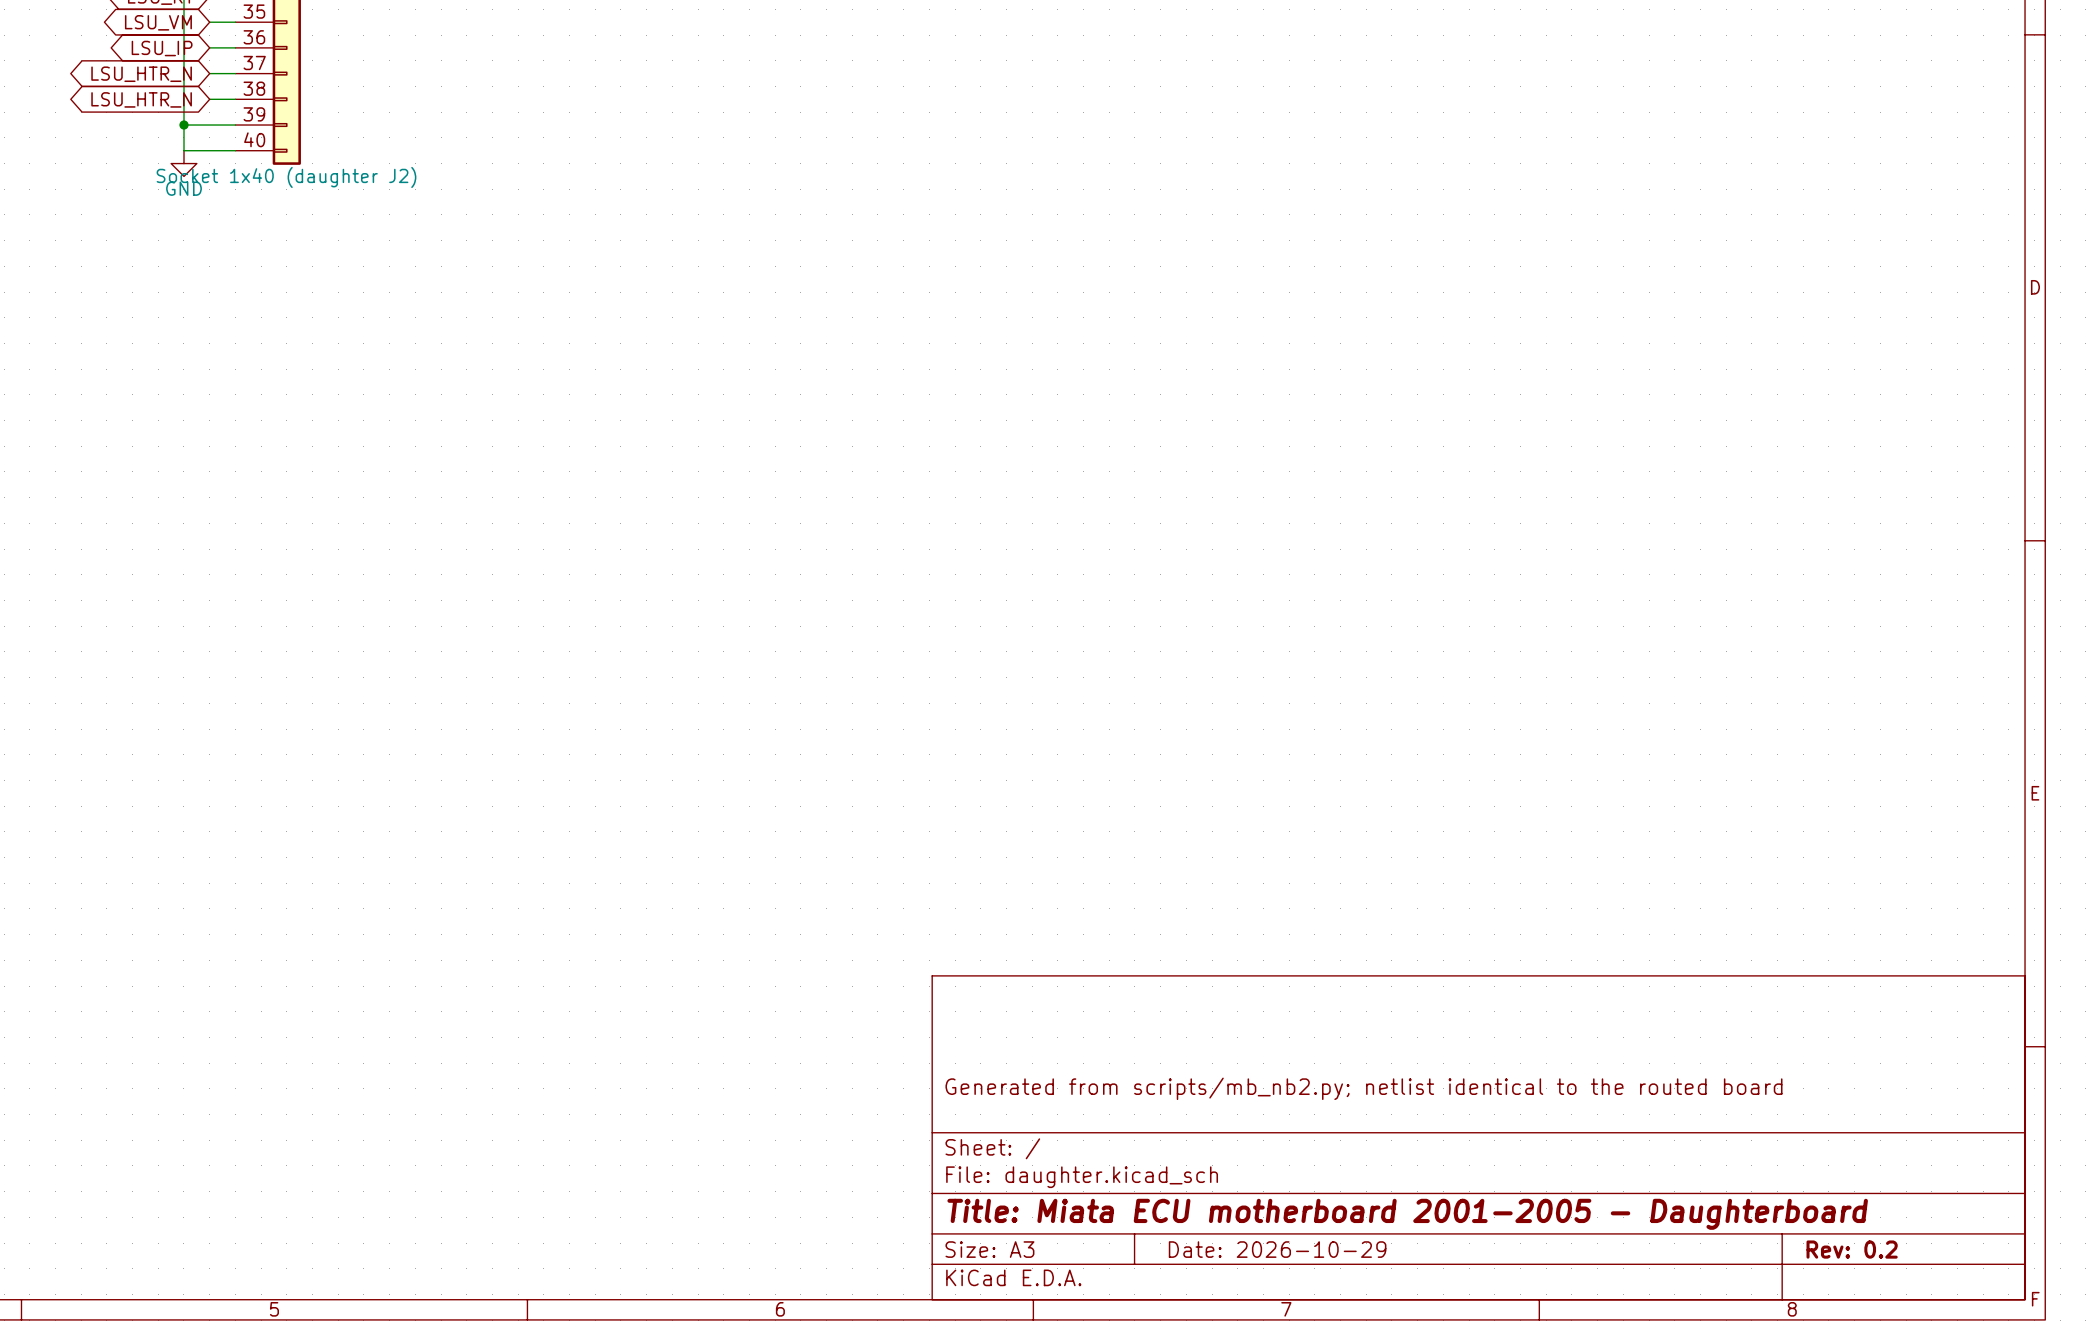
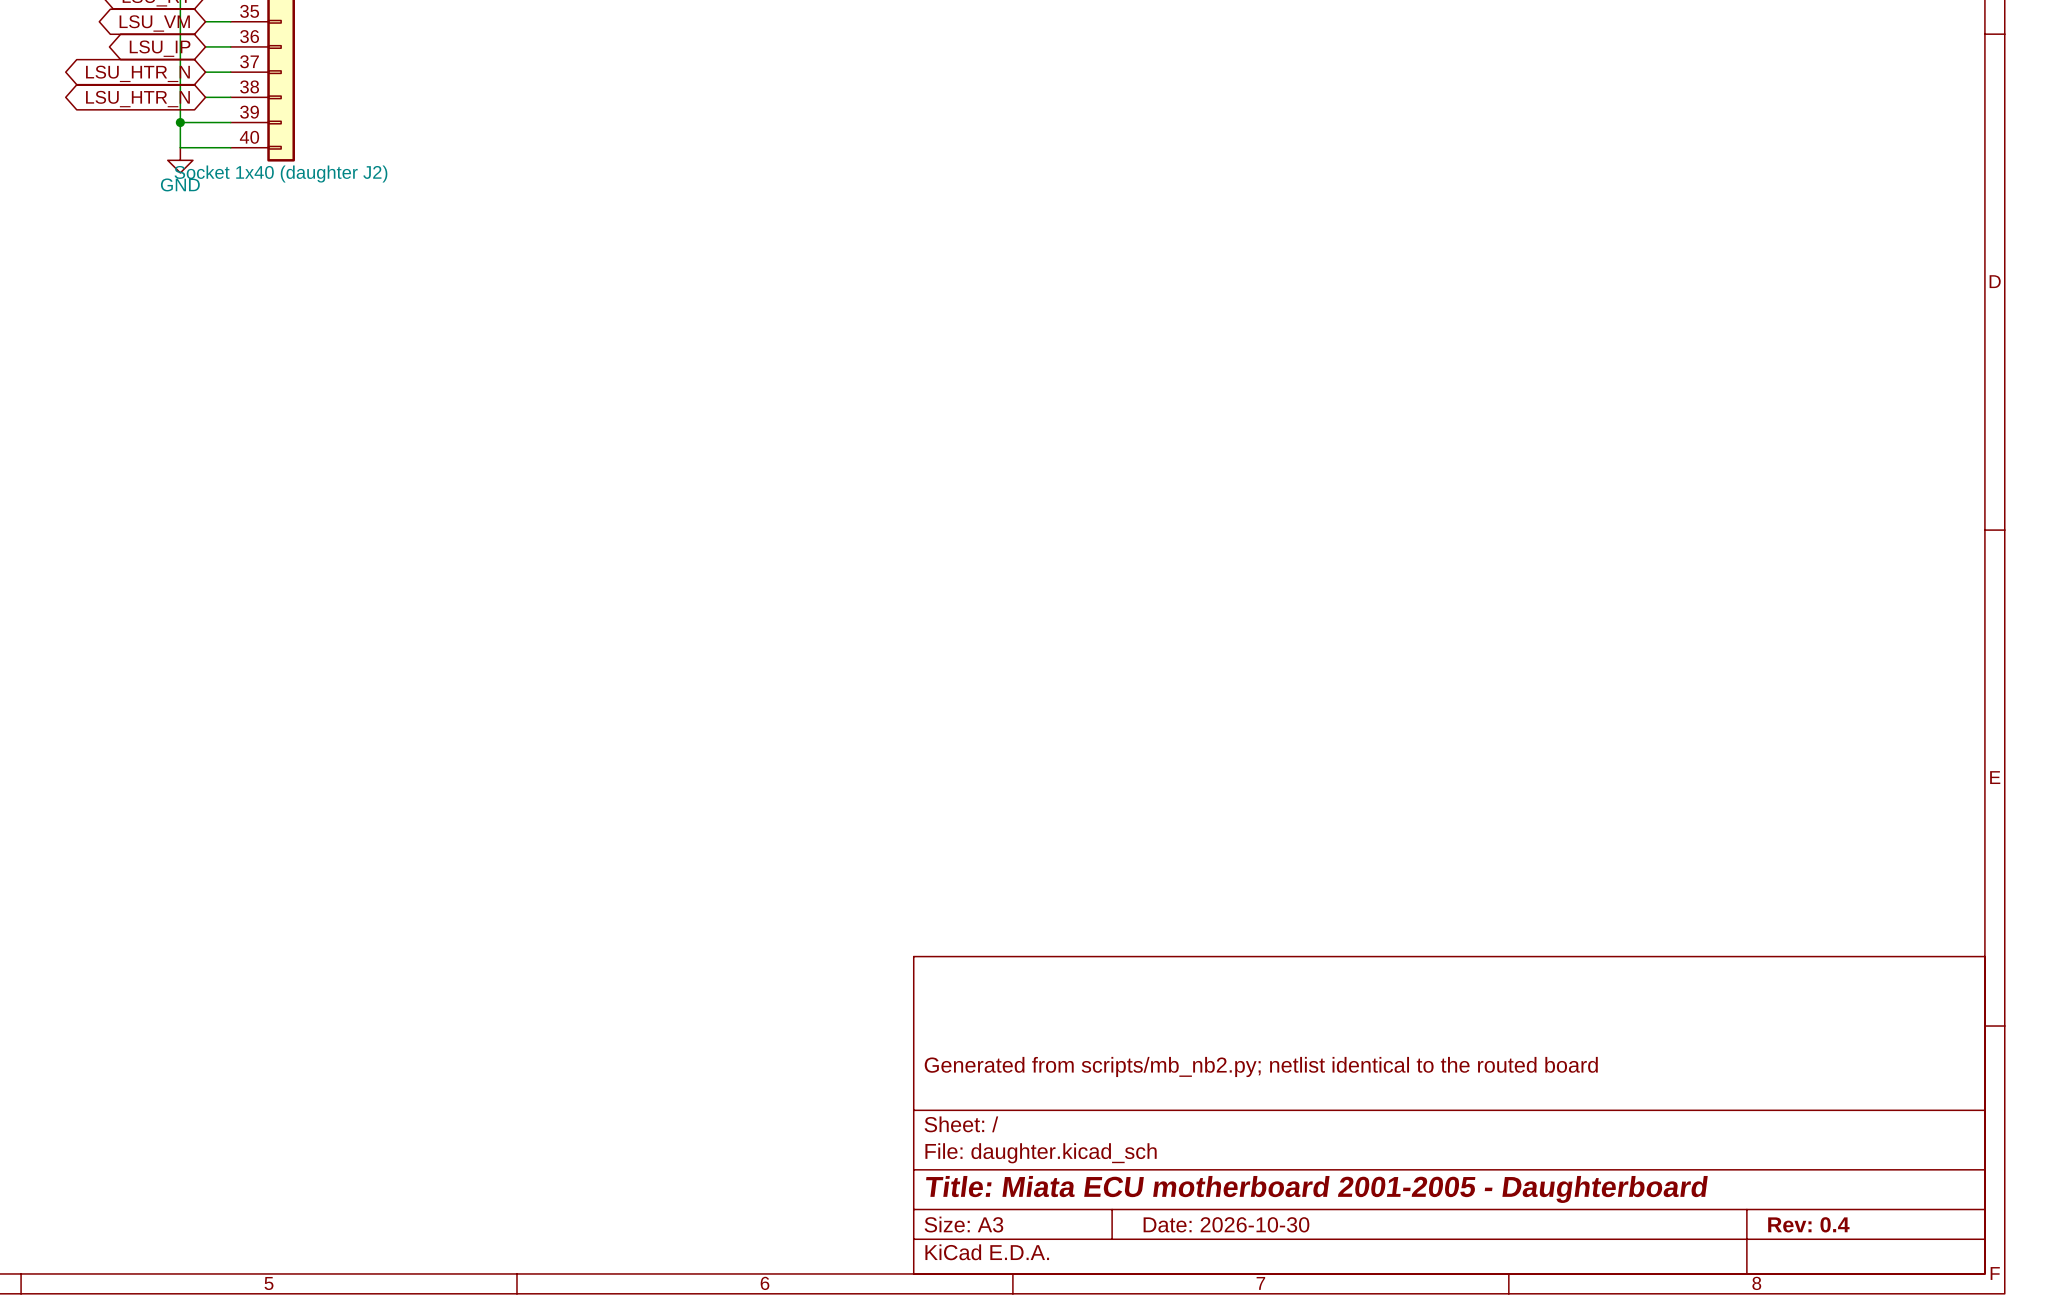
title block: Date: 2026-10-29 (1277, 1249) -> Date: 2026-10-30 (1226, 1224)
title block: Rev: 0.2 (1852, 1249) -> Rev: 0.4 (1808, 1224)

